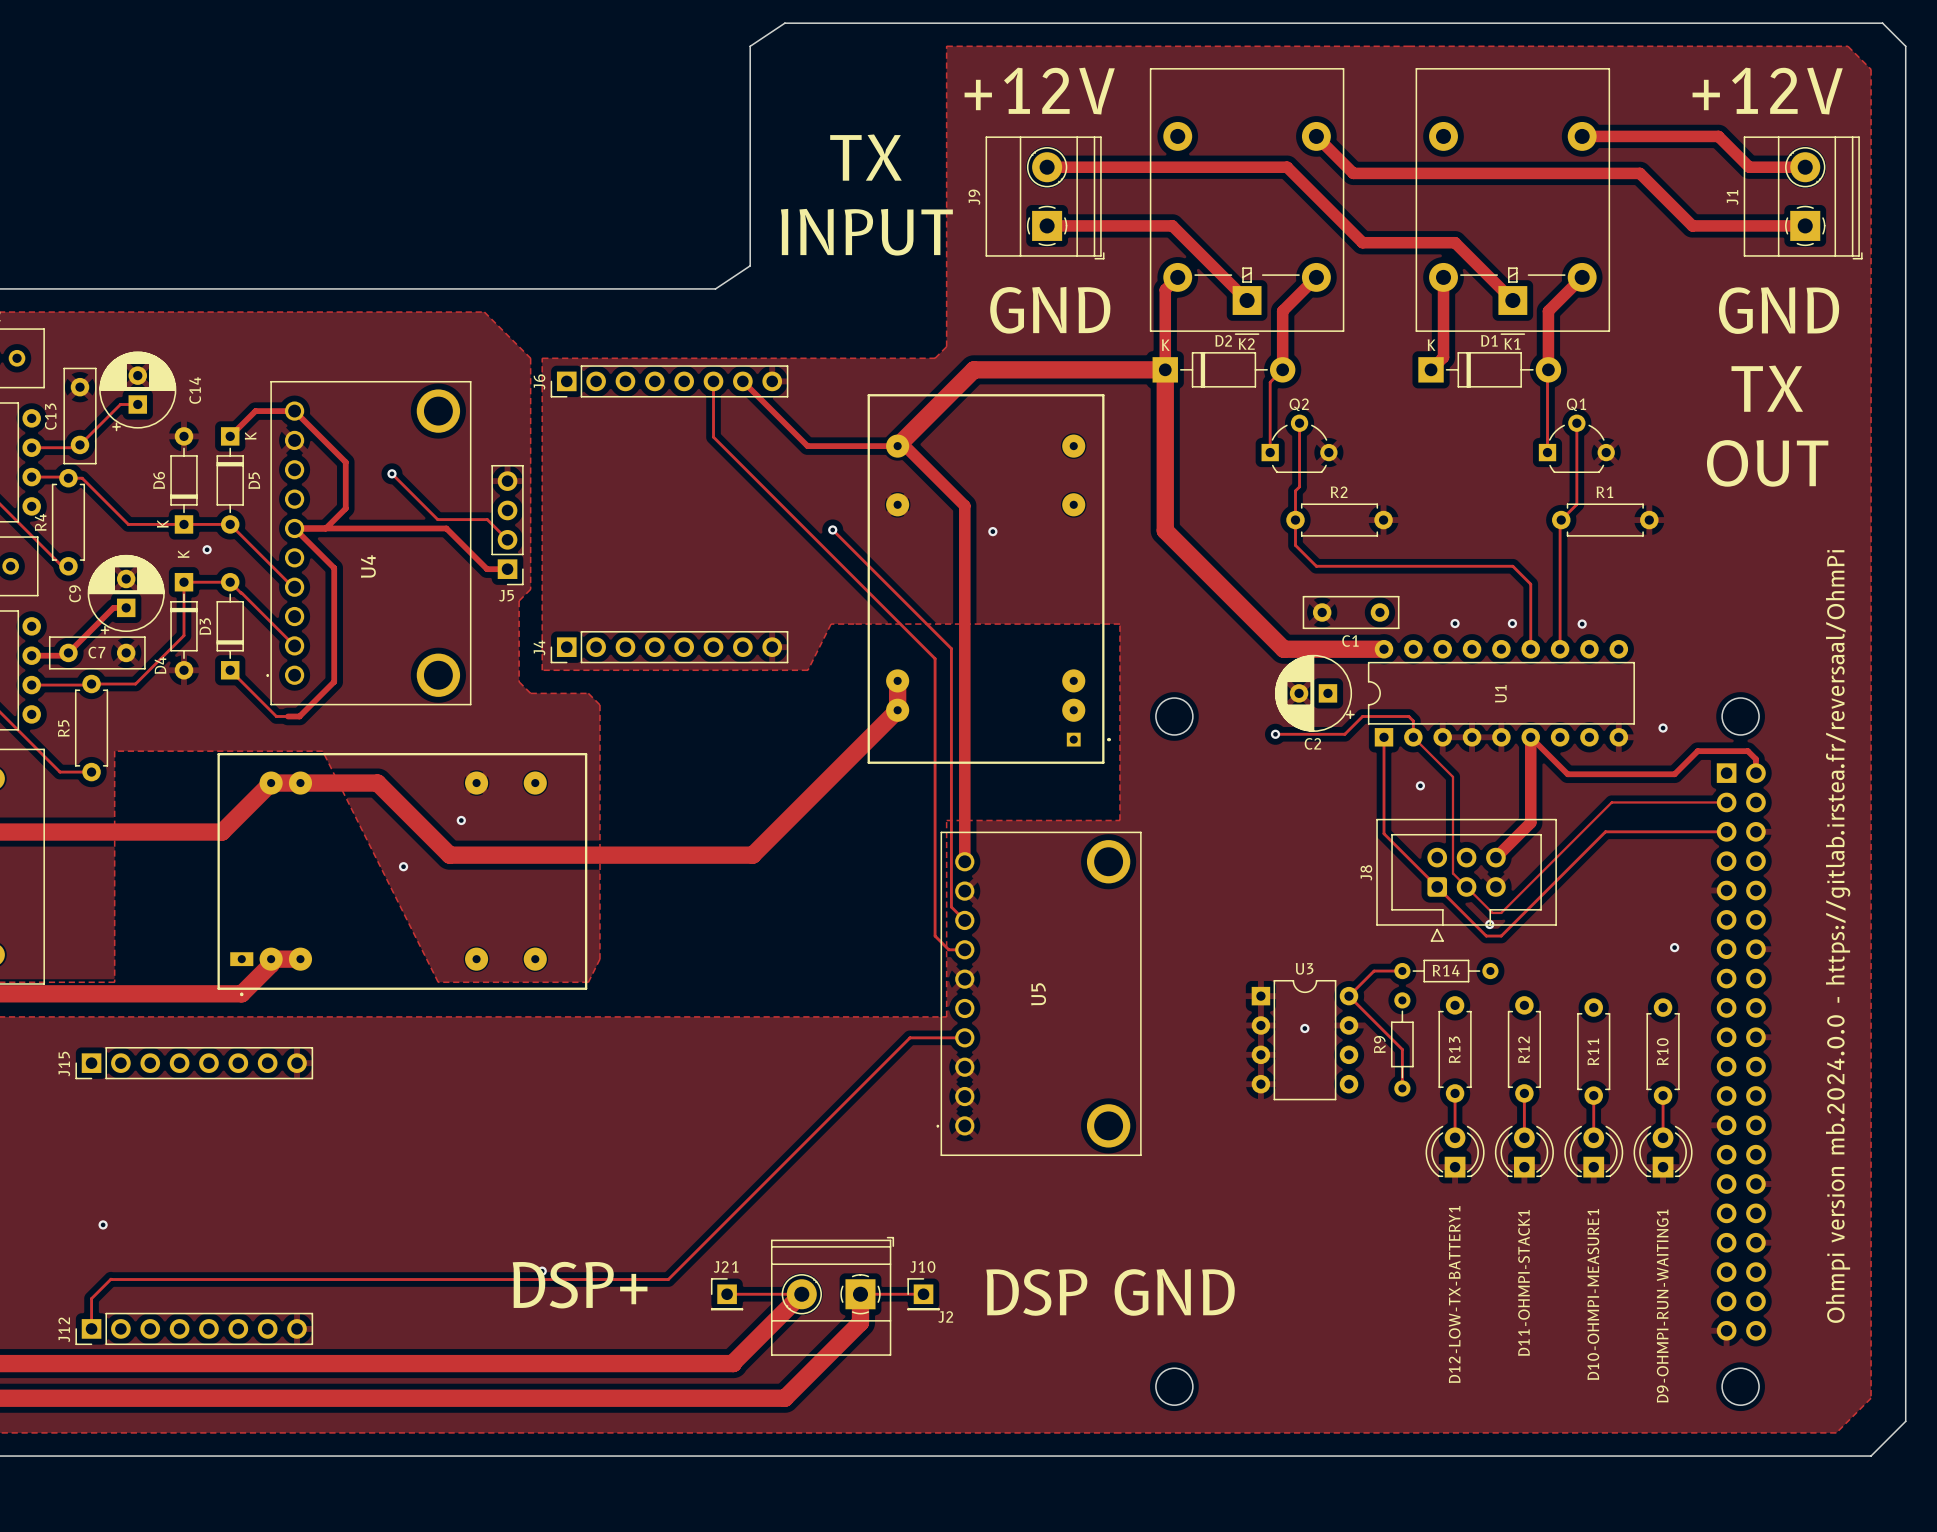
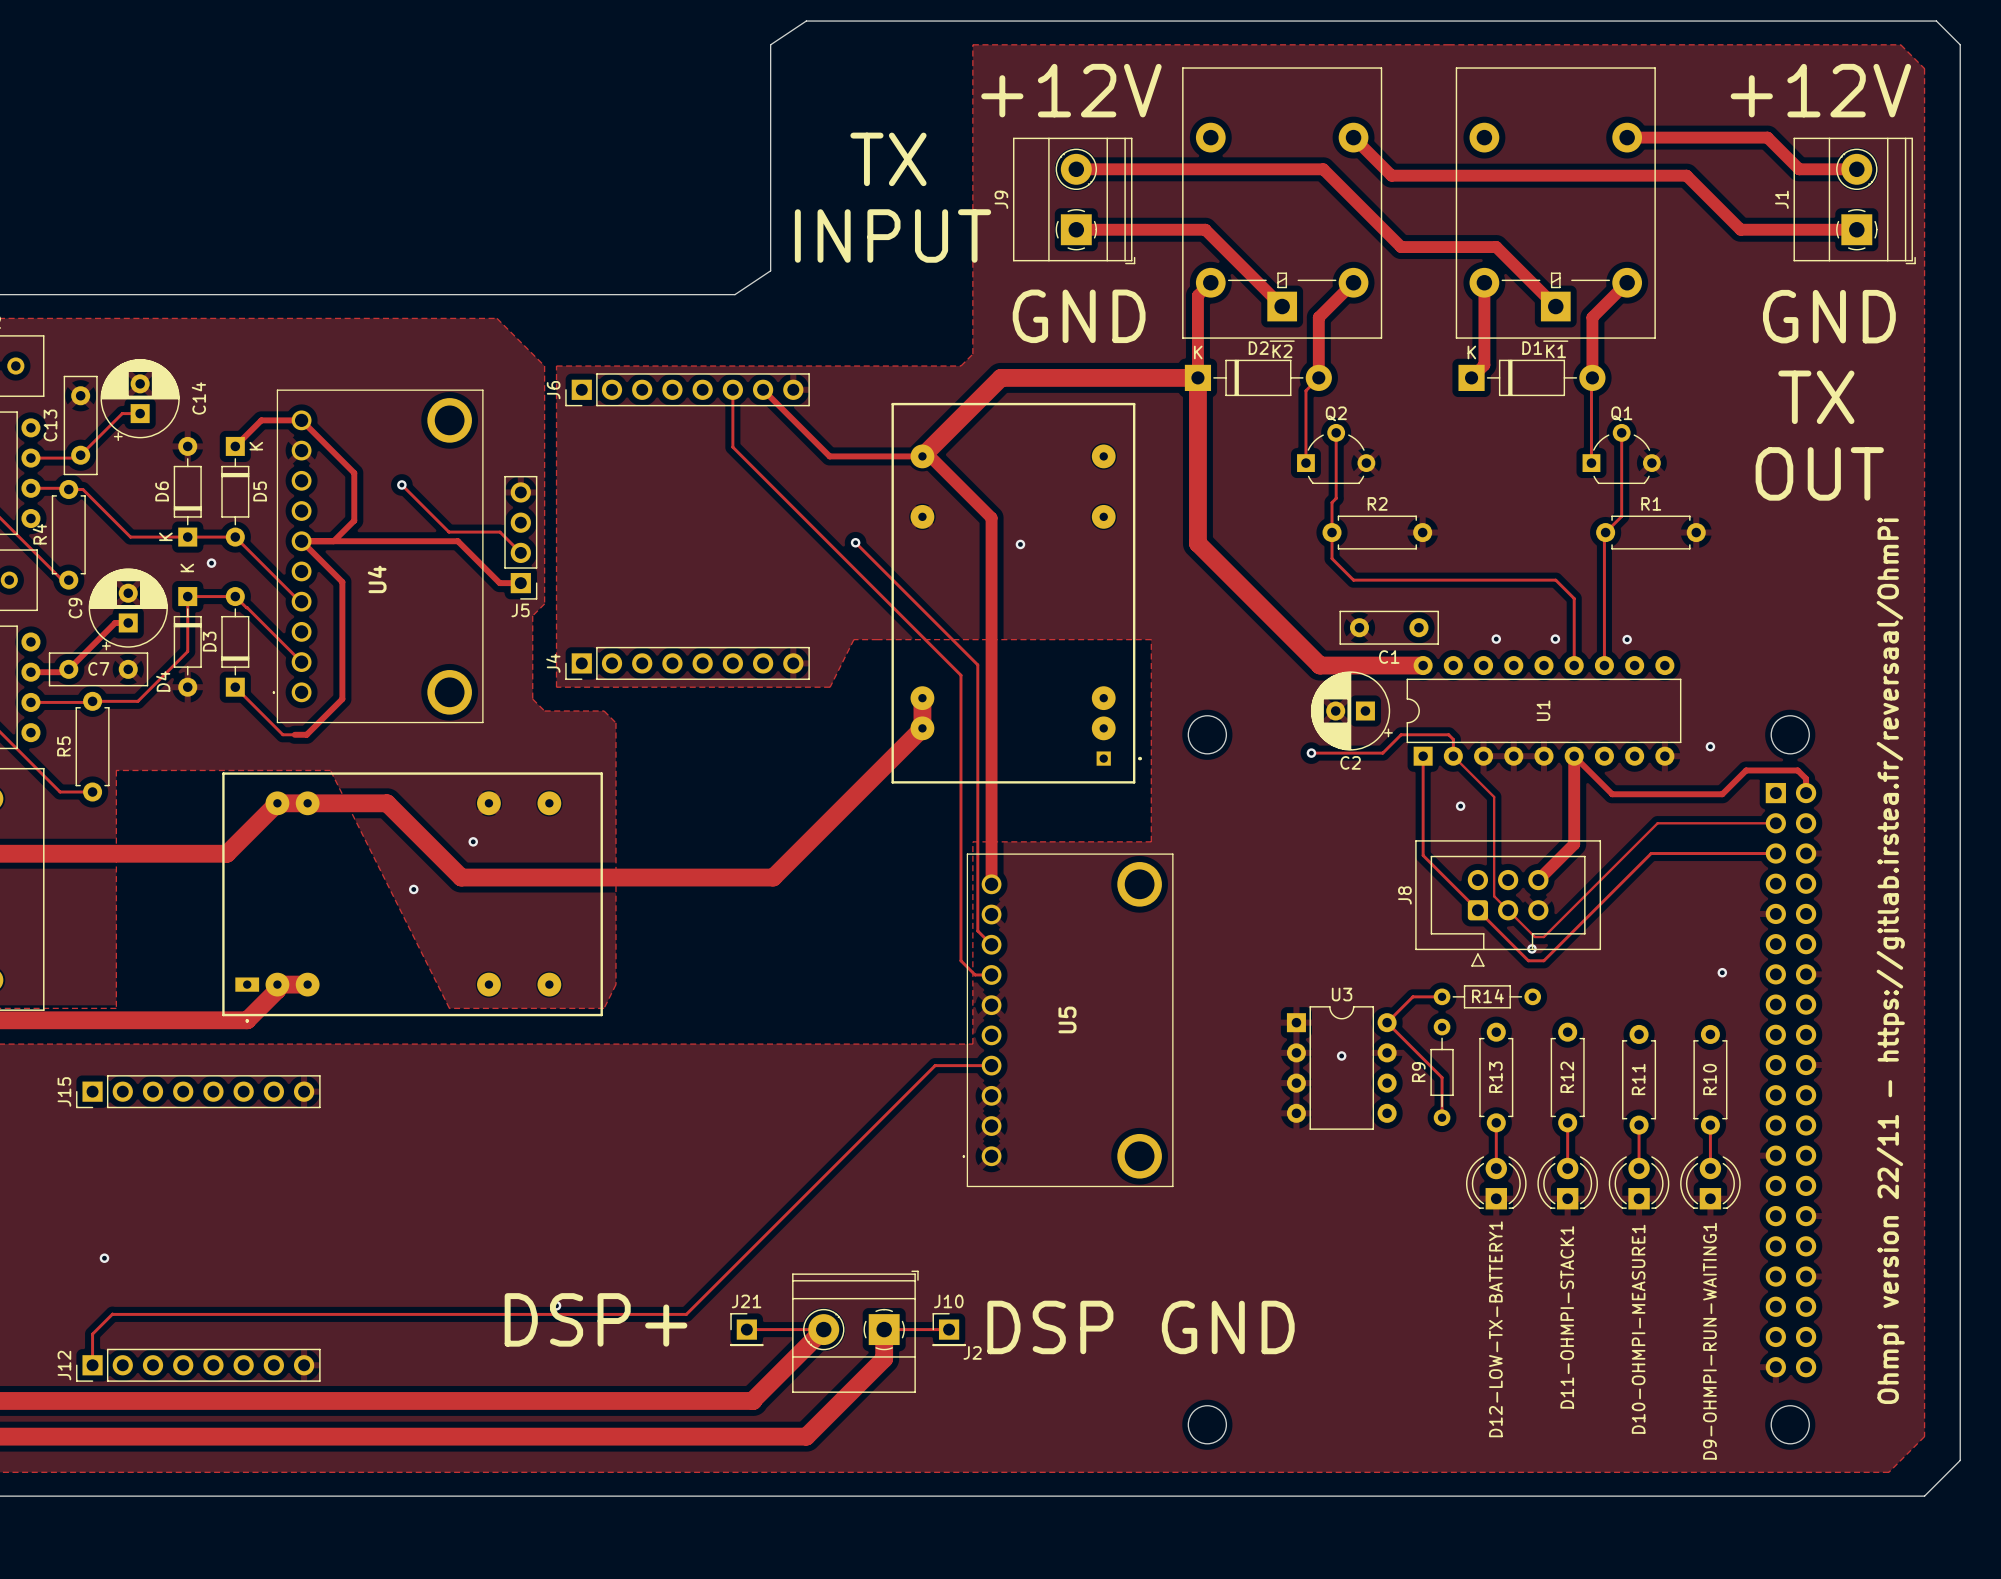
text: Ohmpi version mb.2024.0.0 - https://gitlab.irstea.fr/reversaal/OhmPi (1838, 936) -> Ohmpi version 22/11 - https://gitlab.irstea.fr/reversaal/OhmPi (1890, 960)

